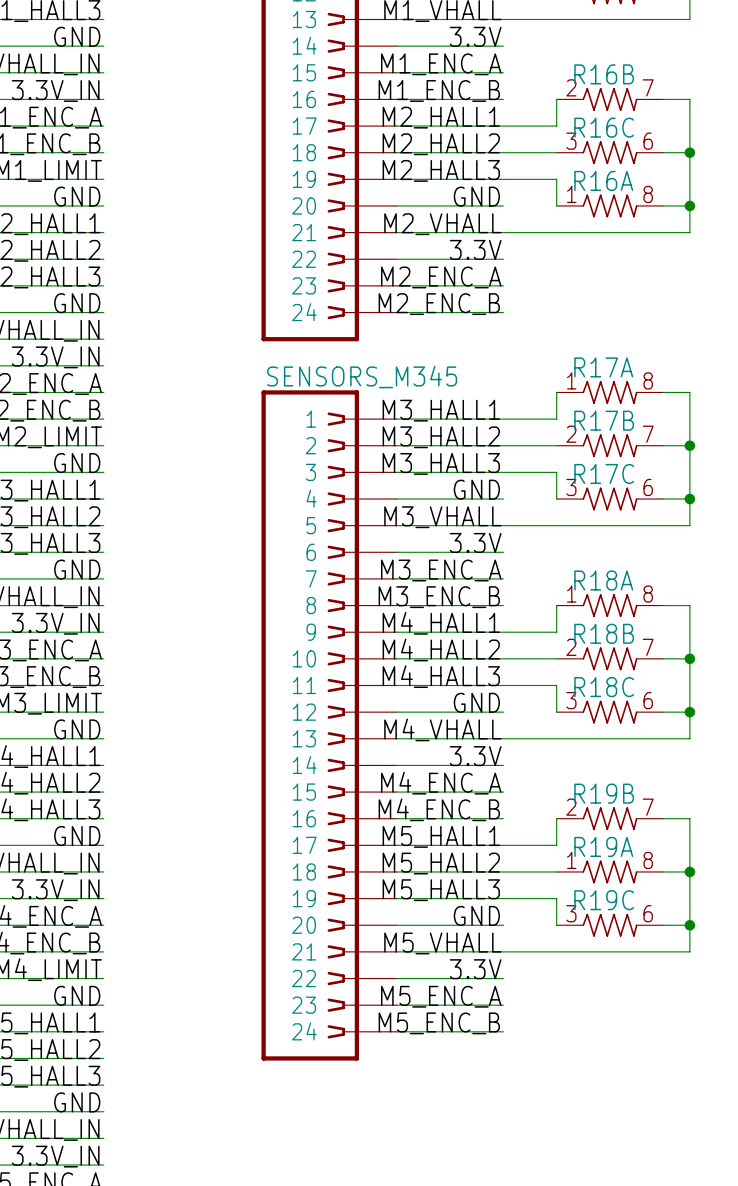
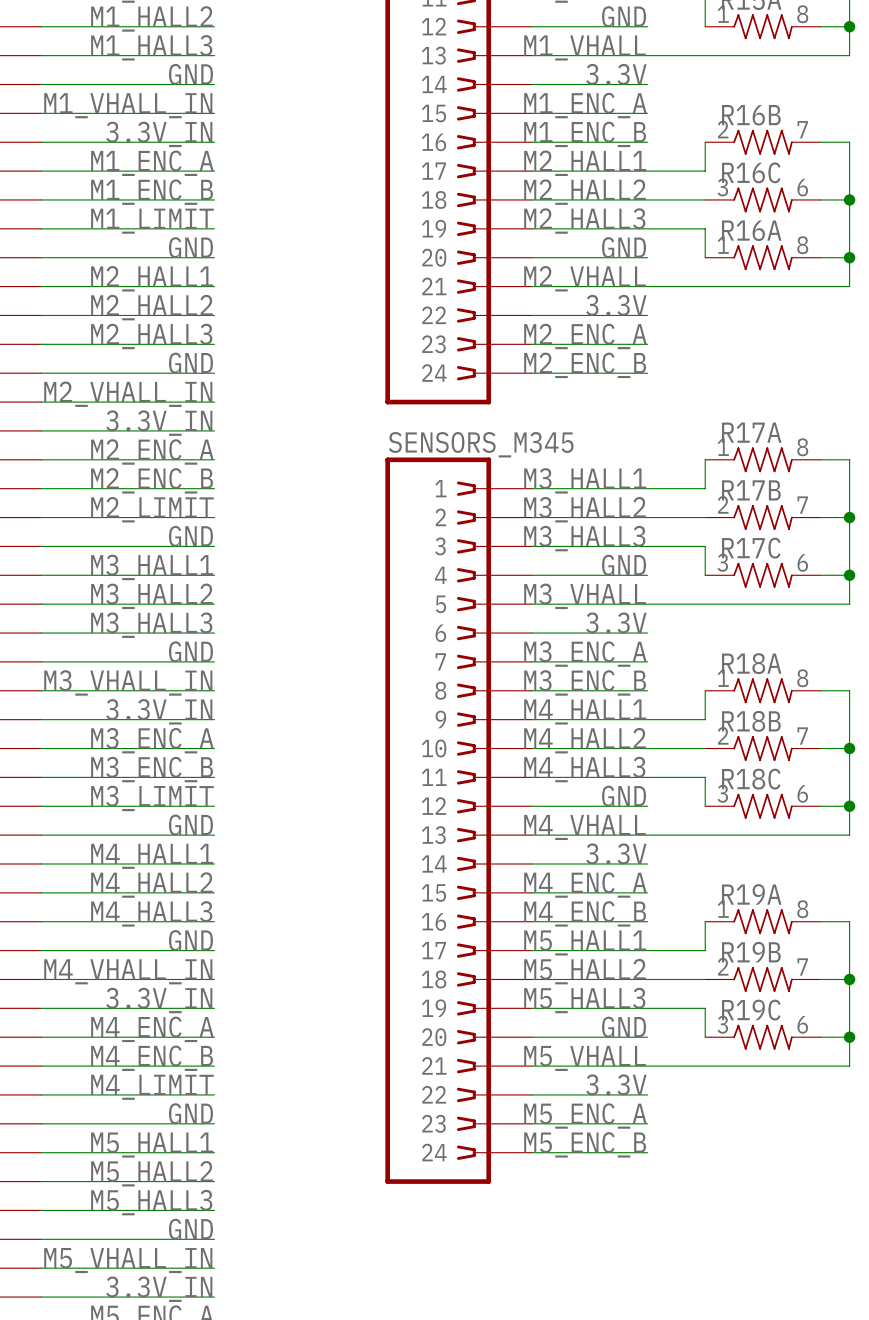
R19B position: (609, 818) -> (762, 979)
R19A position: (609, 871) -> (762, 921)

